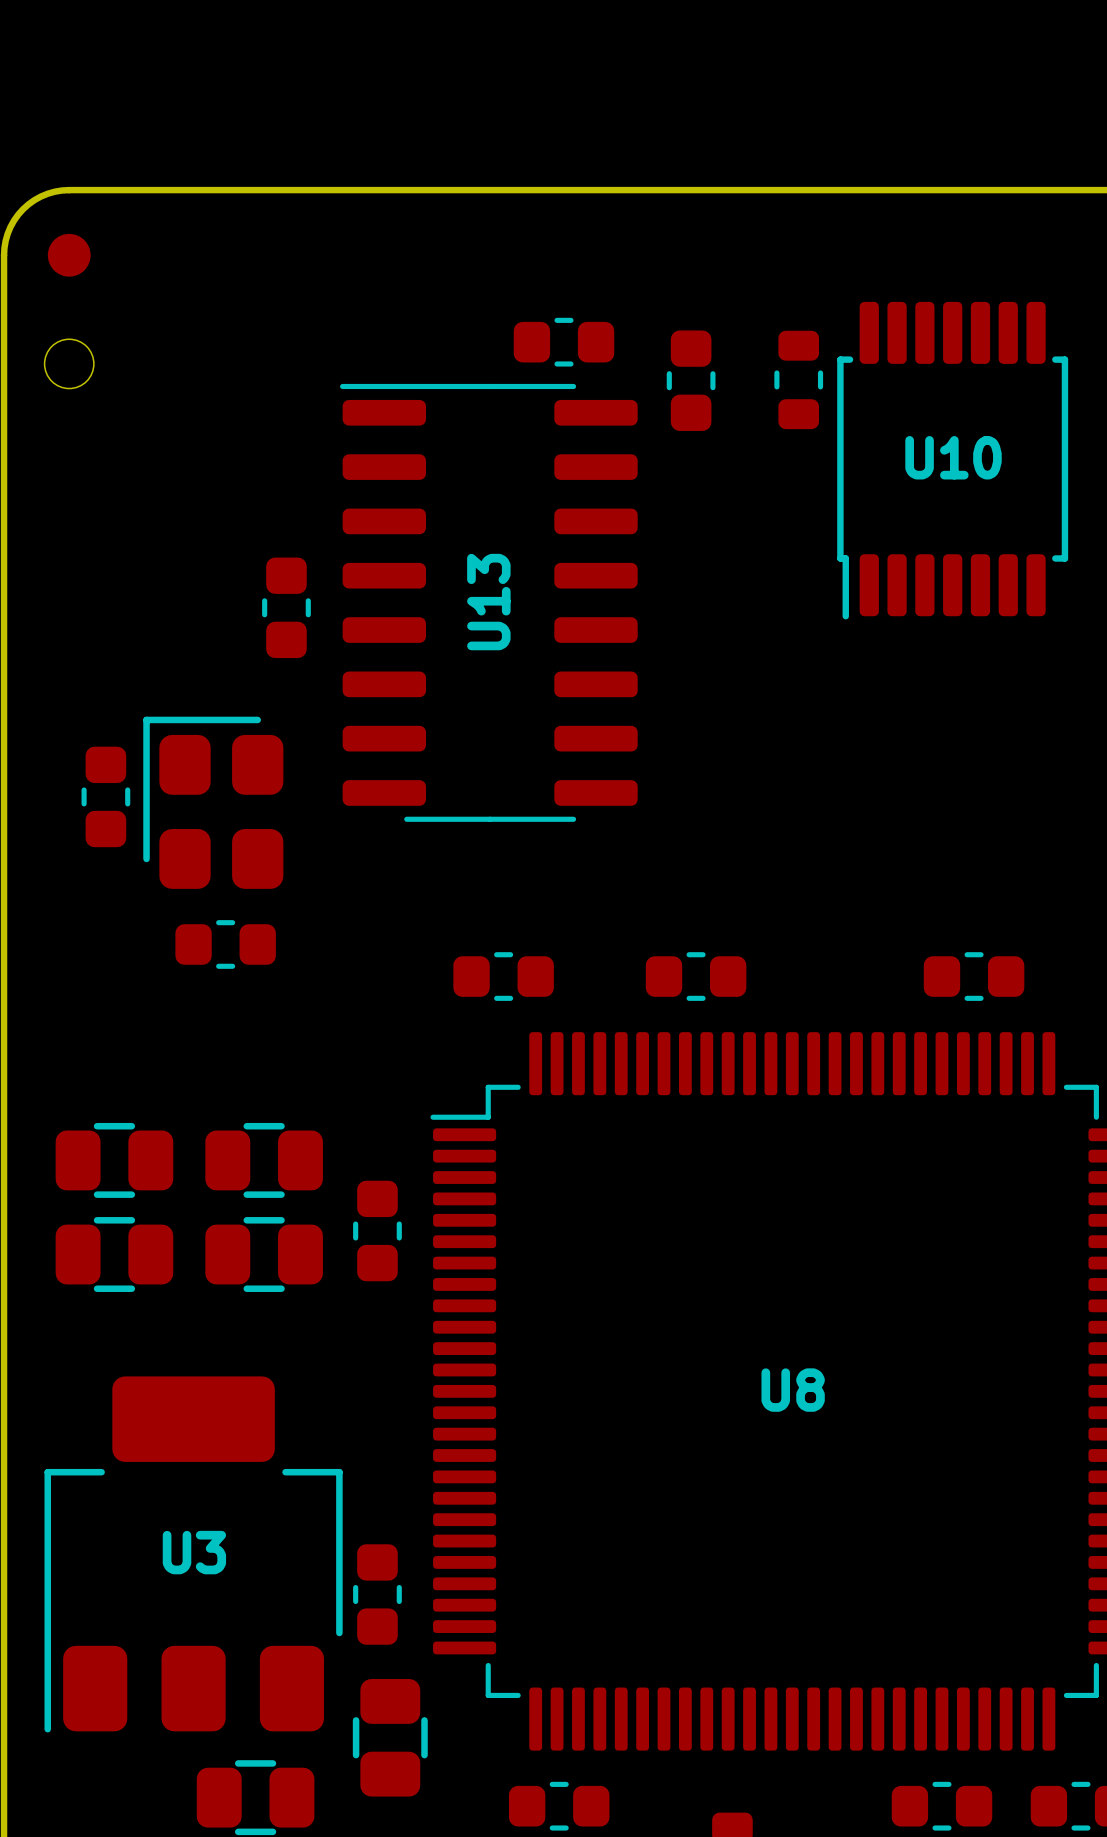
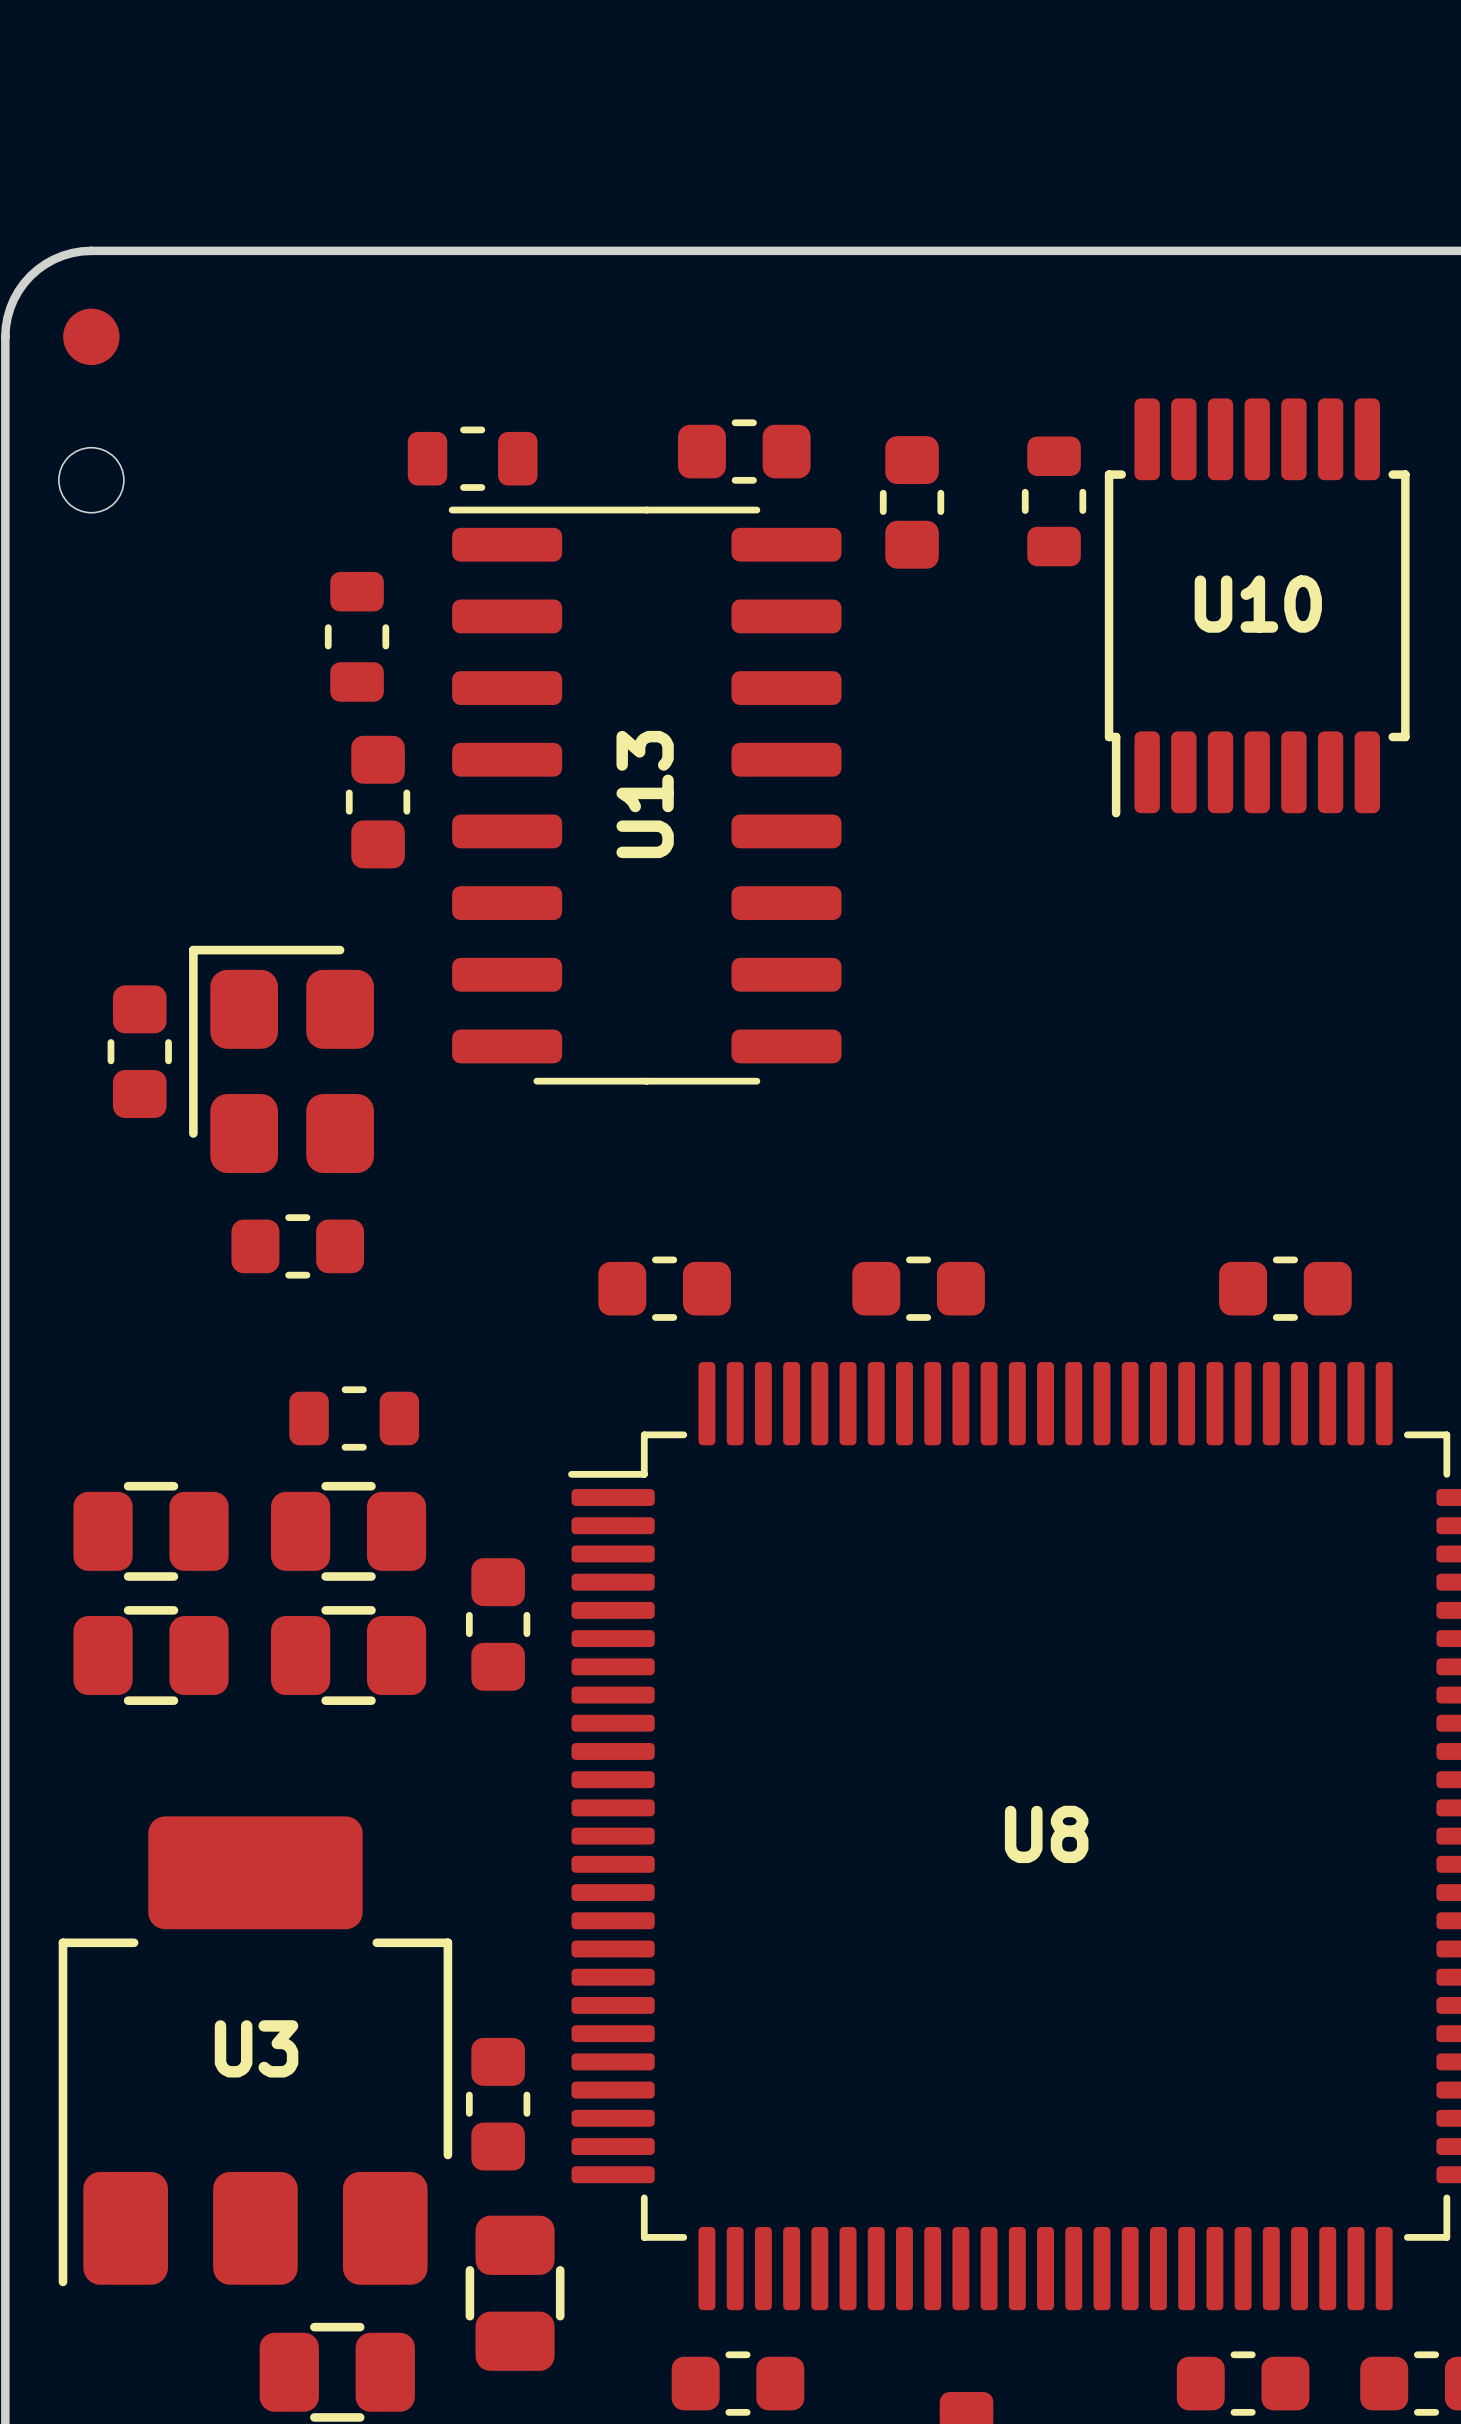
part: none -> (472, 458)
part: none -> (357, 636)
part: none -> (354, 1418)

